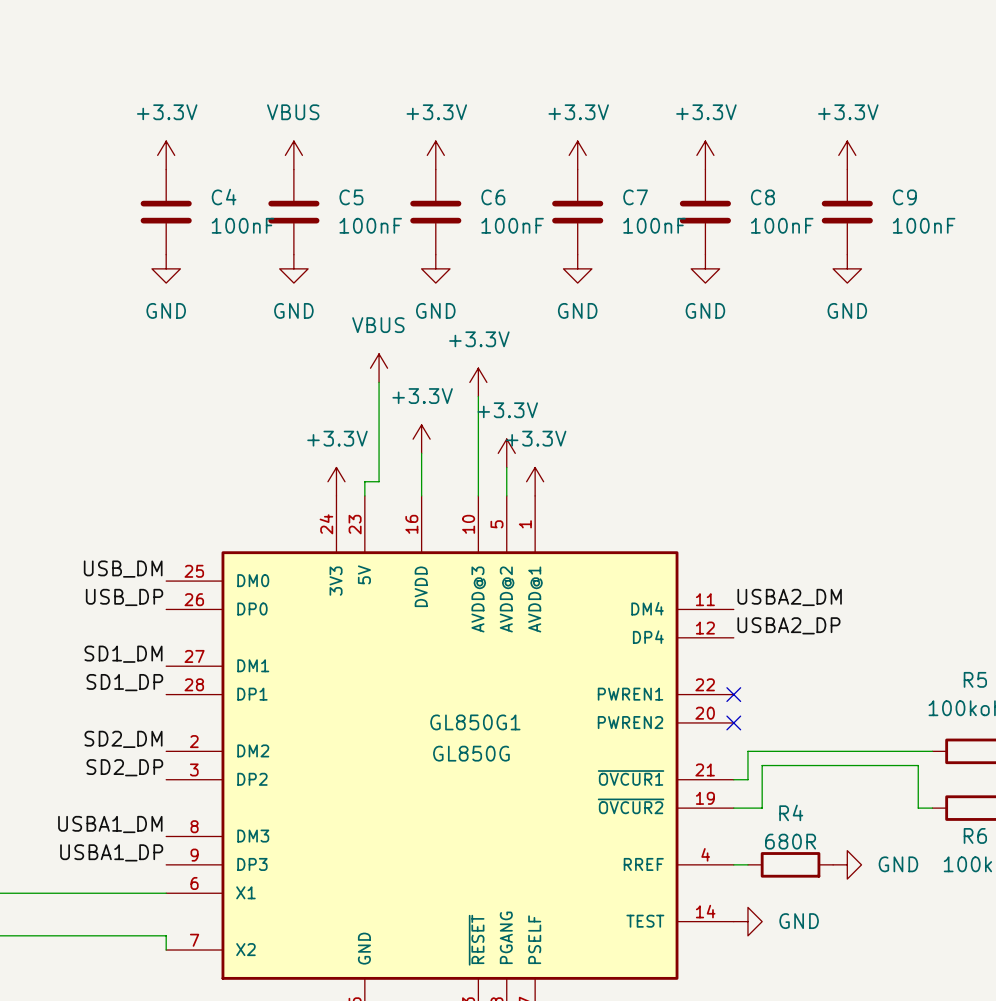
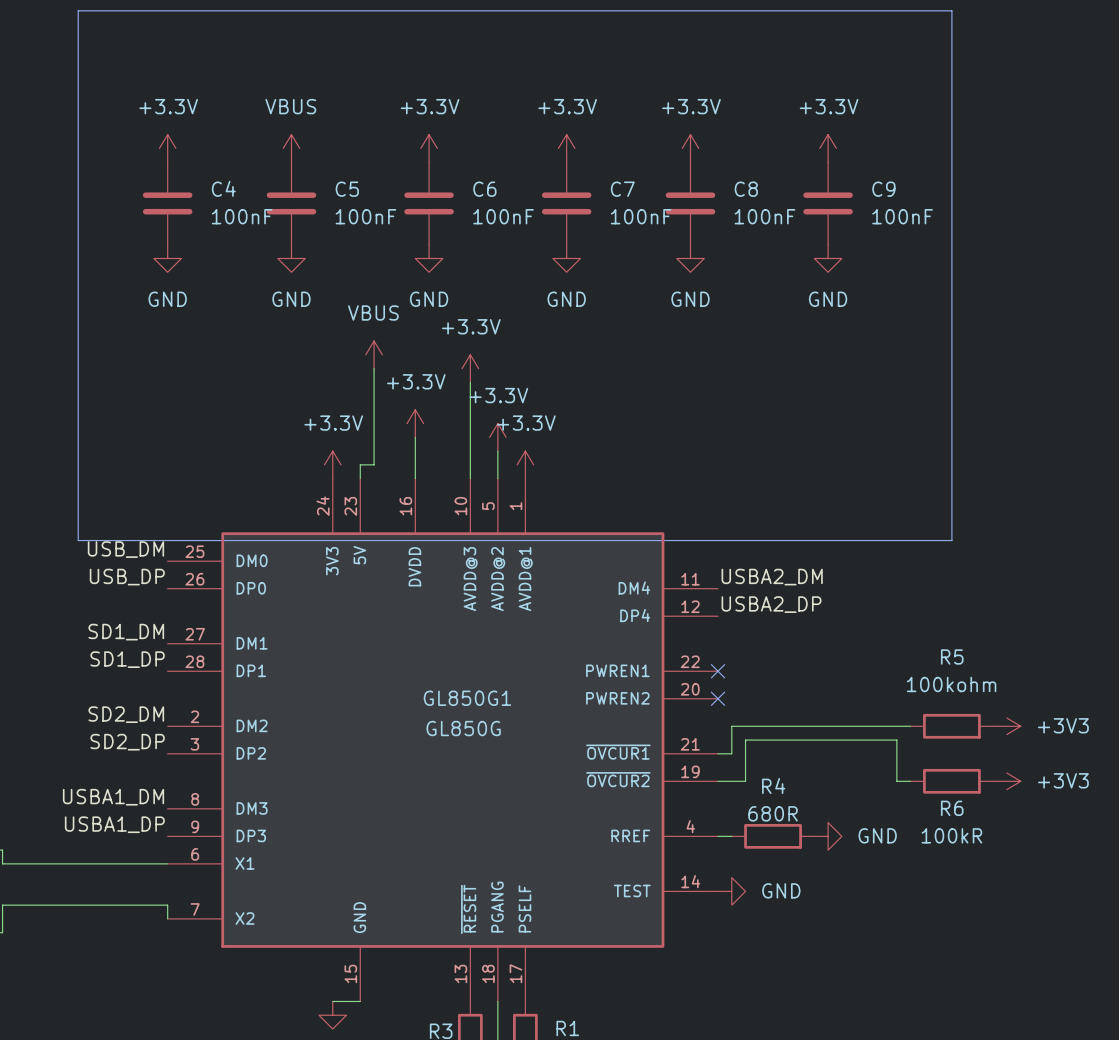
line: none -> (78, 10) (951, 10) (951, 540) (78, 540) (78, 10)

